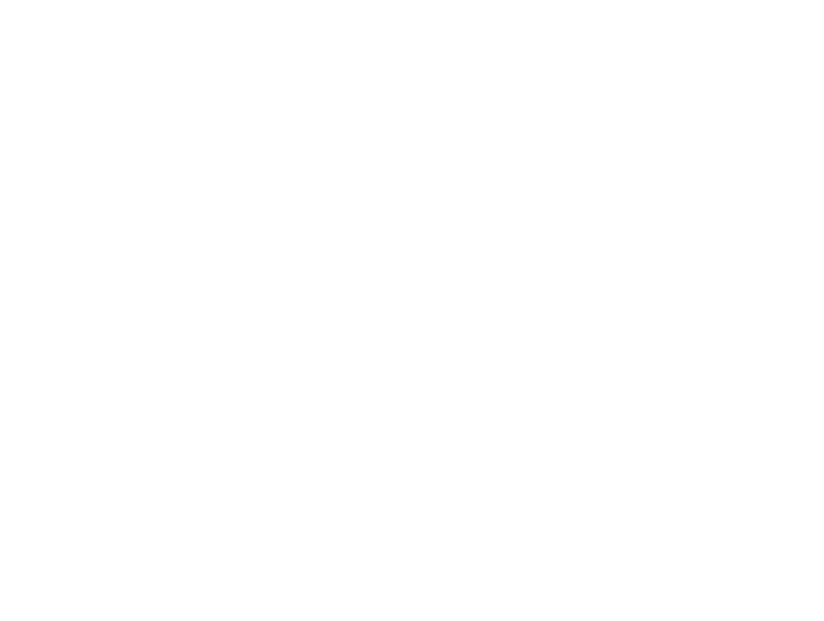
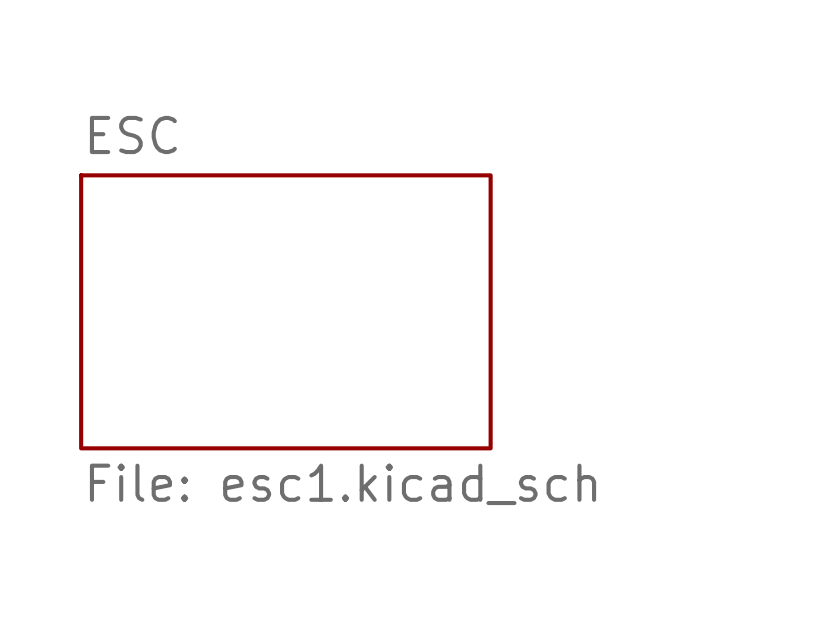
sheet ESC: none -> File: esc1.kicad_sch (285, 311)

